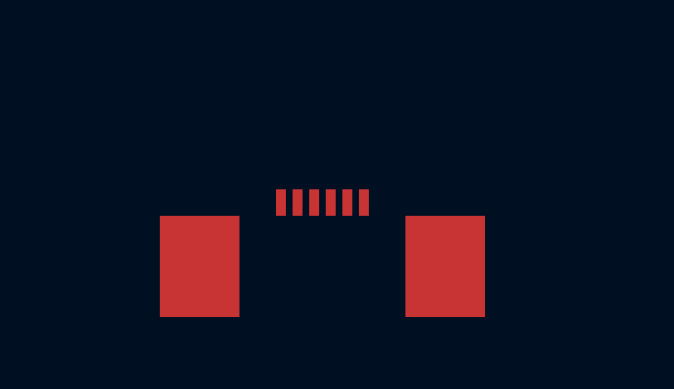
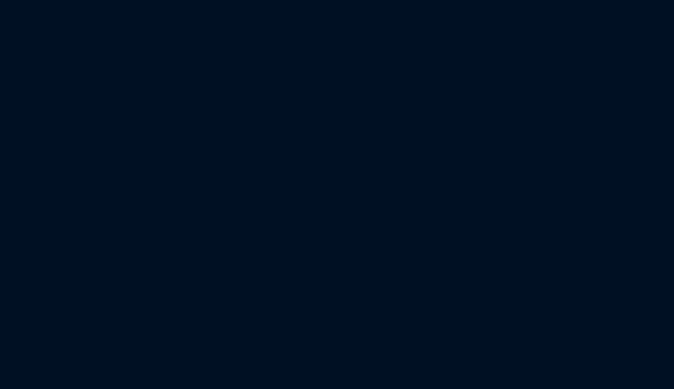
part: (322, 253) -> none

